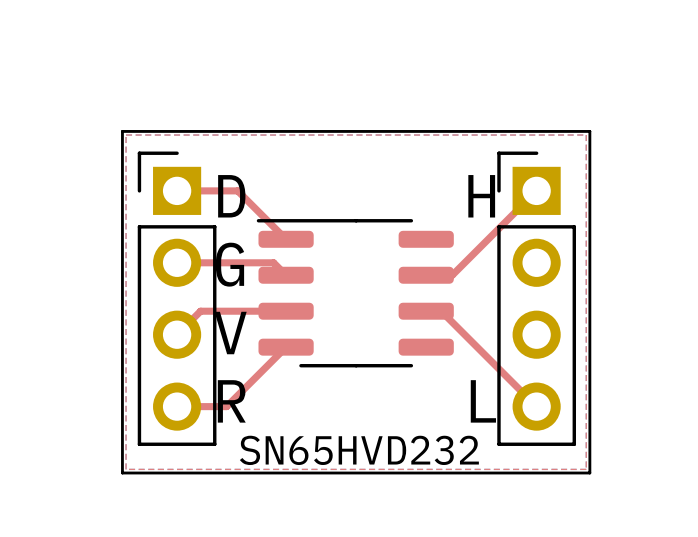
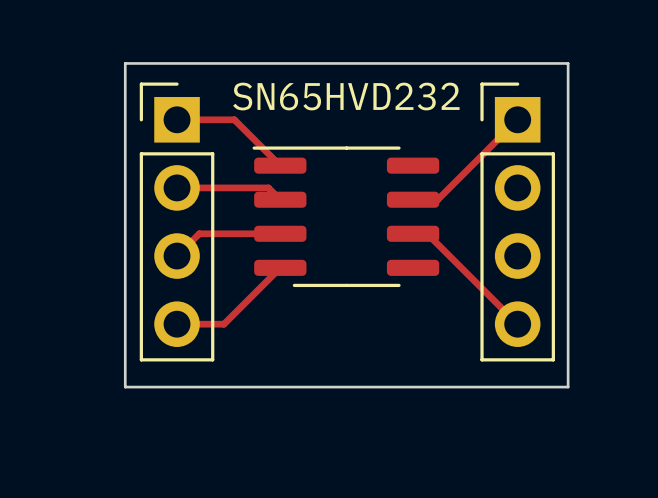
top zone outline: (126, 135) (126, 469) (586, 469) (586, 135) (126, 135) -> none
text: D (231, 196) -> none
text: H (481, 196) -> none
text: G (229, 264) -> none
text: V (230, 333) -> none
text: R (231, 401) -> none
text: L (483, 401) -> none
part value position: SN65HVD232 (359, 450) -> SN65HVD232 (346, 96)

